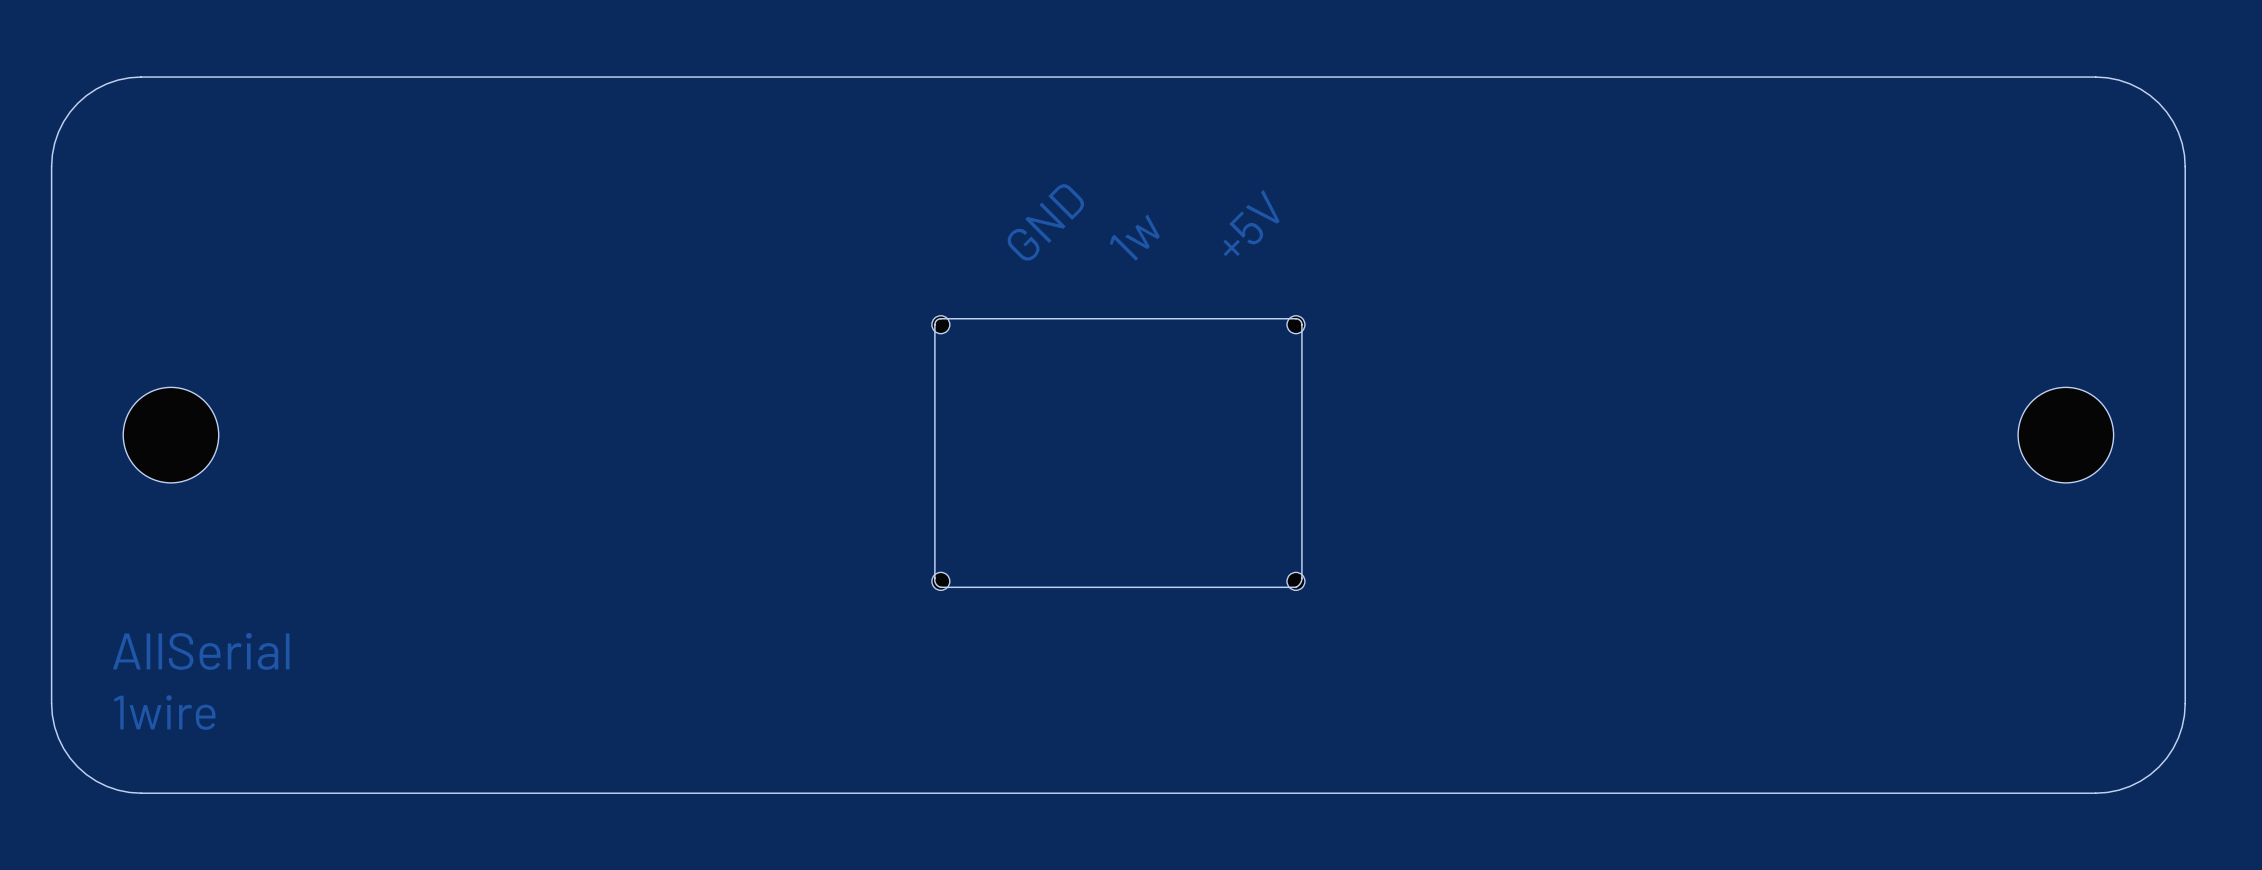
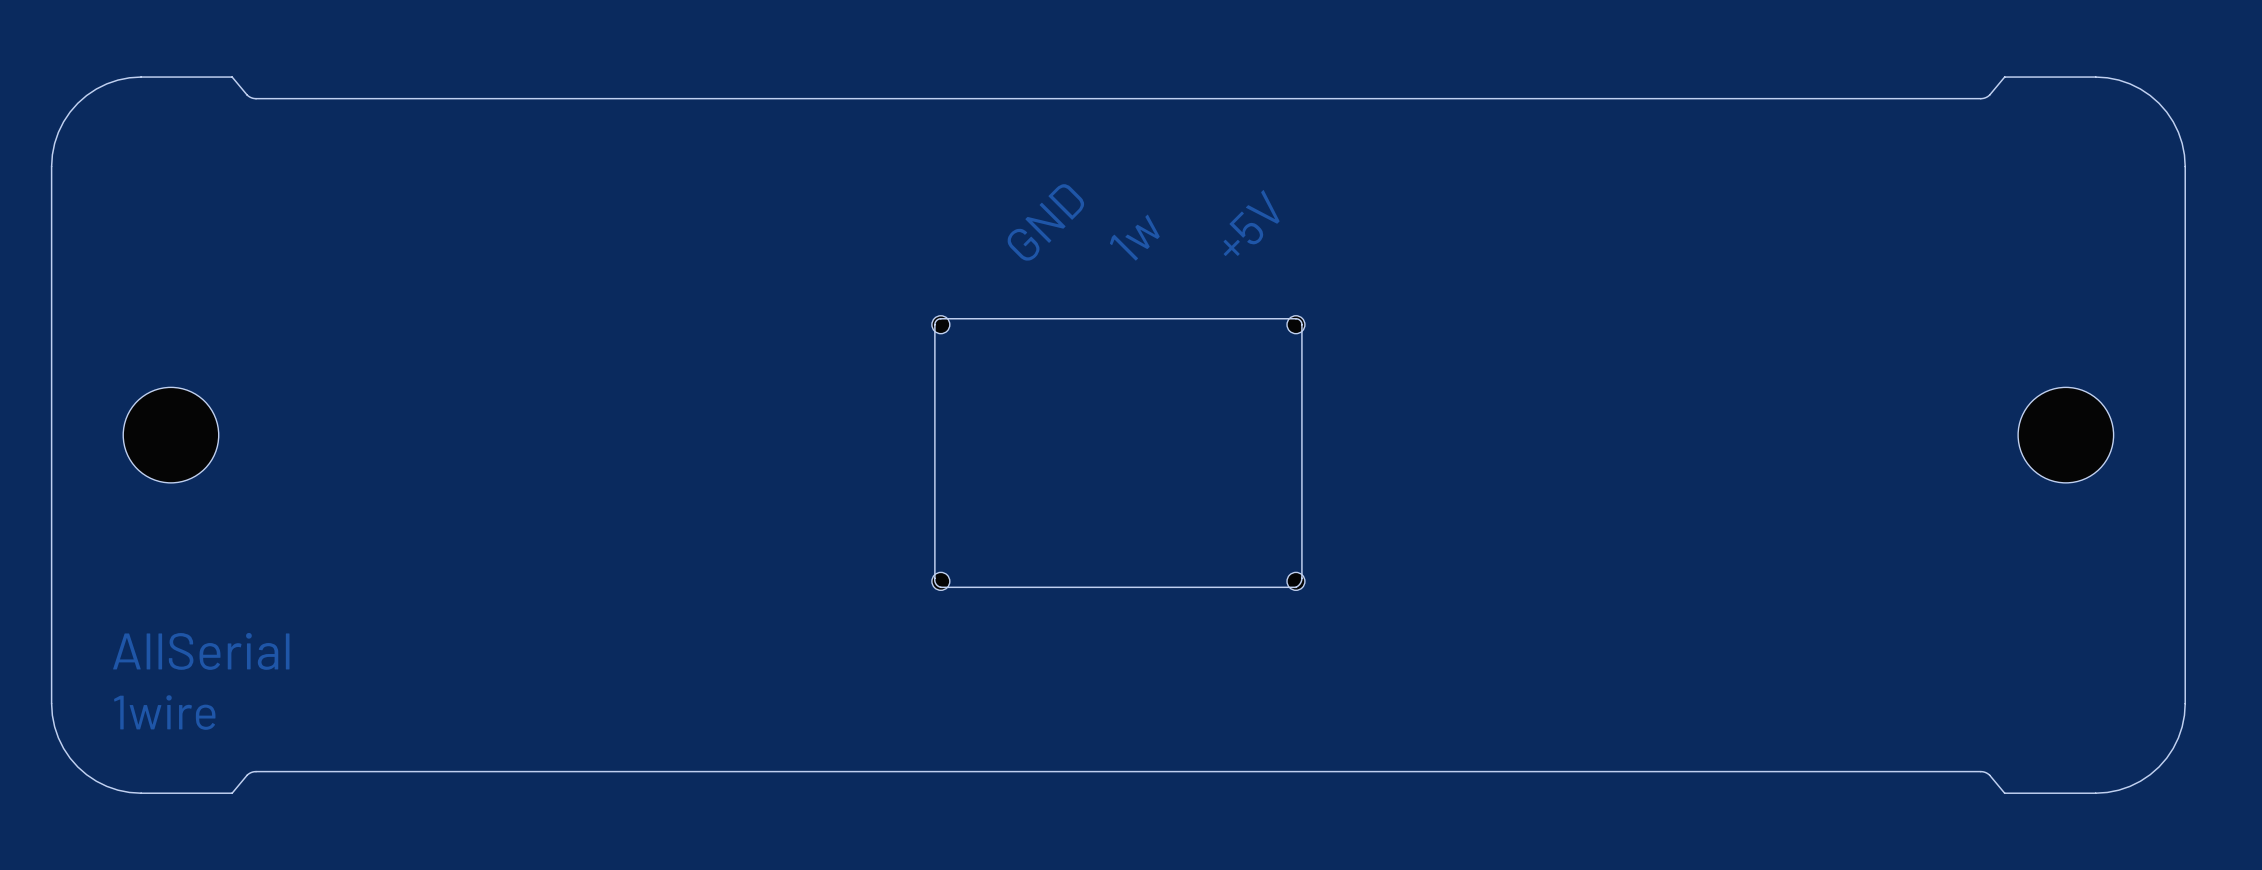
part footprint: [50, 76, 2186, 794] -> [50, 76, 2186, 794]

